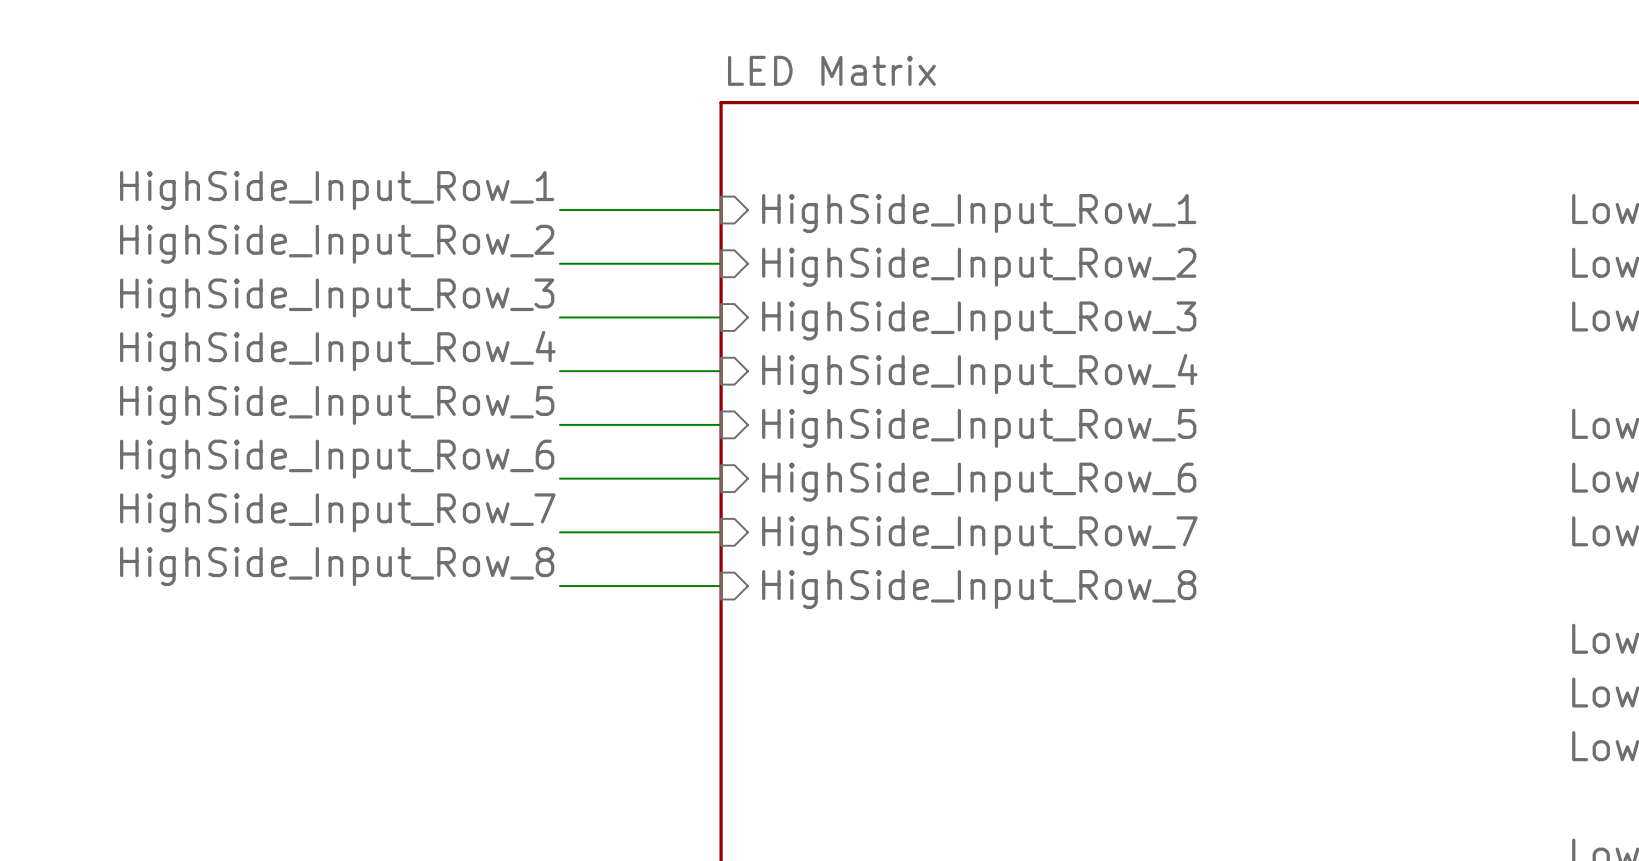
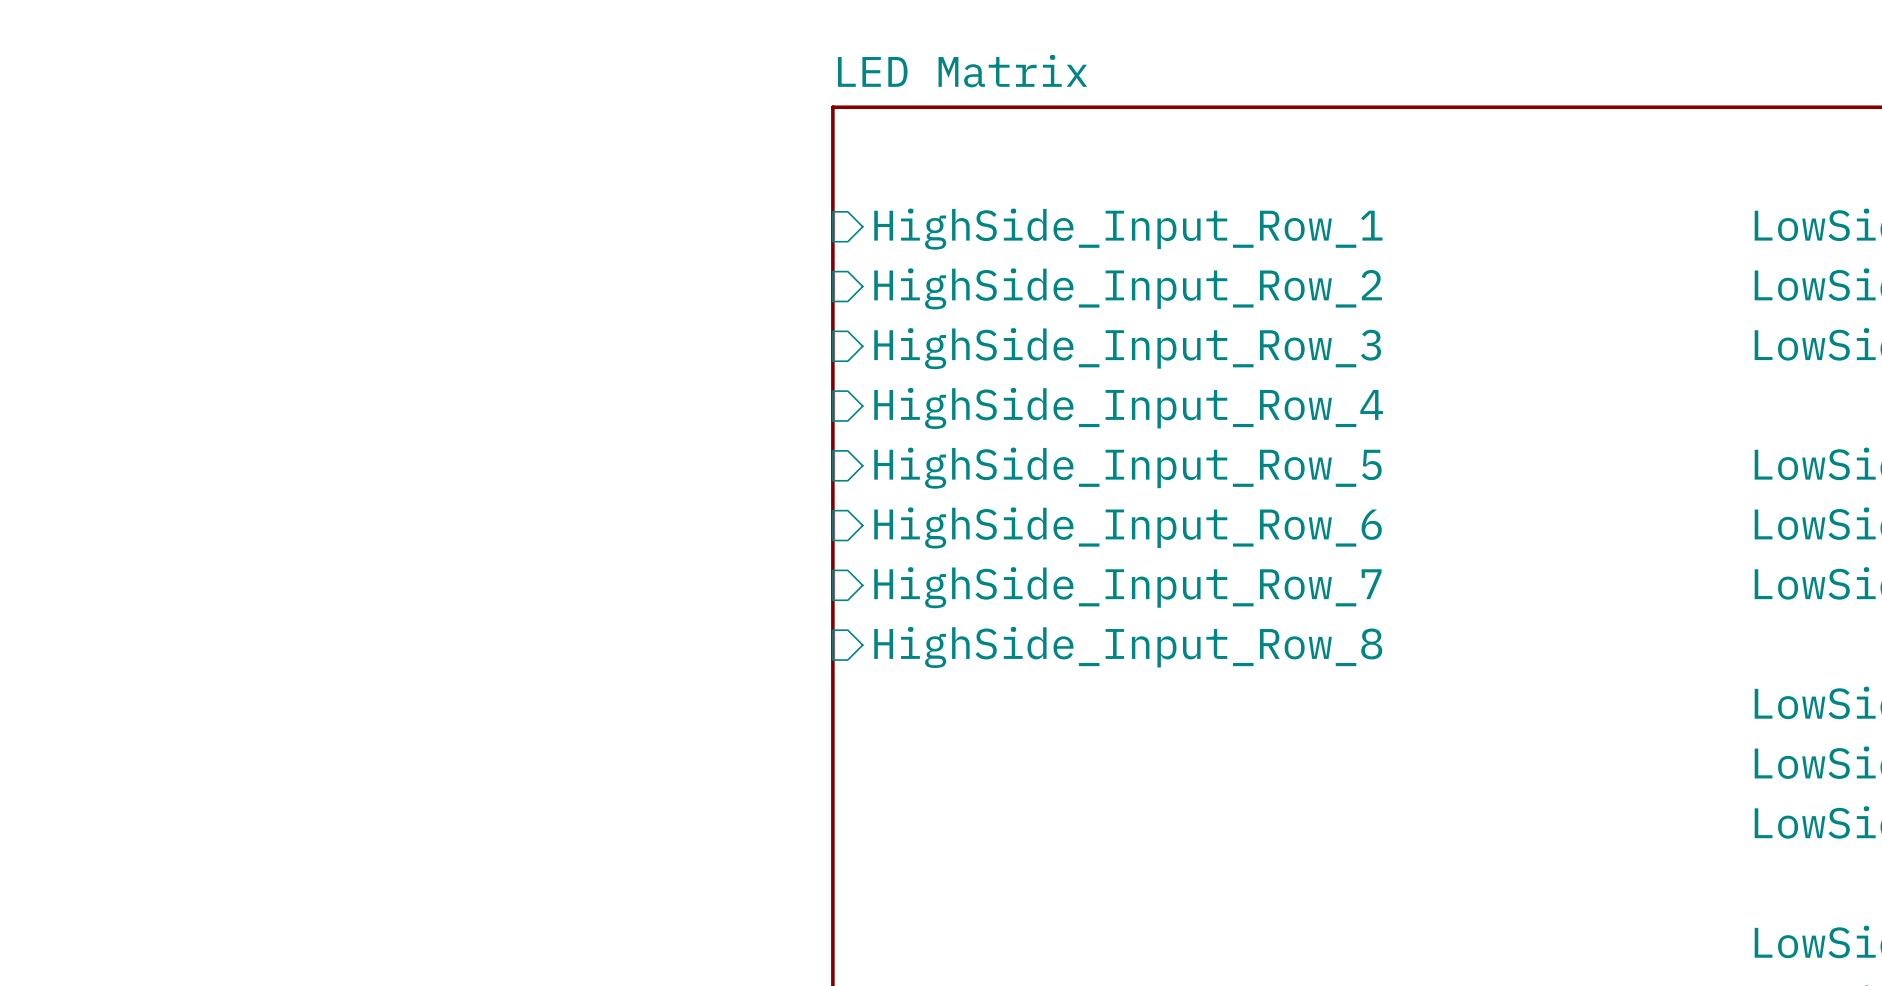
label: HighSide_Input_Row_1 (337, 190) -> none
wire: (559, 210) (721, 210) -> none
label: HighSide_Input_Row_2 (337, 244) -> none
wire: (559, 263) (721, 263) -> none
label: HighSide_Input_Row_3 (337, 297) -> none
wire: (559, 317) (721, 317) -> none
label: HighSide_Input_Row_4 (337, 351) -> none
wire: (559, 371) (721, 371) -> none
label: HighSide_Input_Row_5 (337, 405) -> none
wire: (559, 424) (721, 424) -> none
label: HighSide_Input_Row_6 (337, 459) -> none
wire: (559, 478) (721, 478) -> none
label: HighSide_Input_Row_7 (337, 512) -> none
wire: (559, 532) (721, 532) -> none
label: HighSide_Input_Row_8 (337, 566) -> none
wire: (559, 586) (721, 586) -> none

